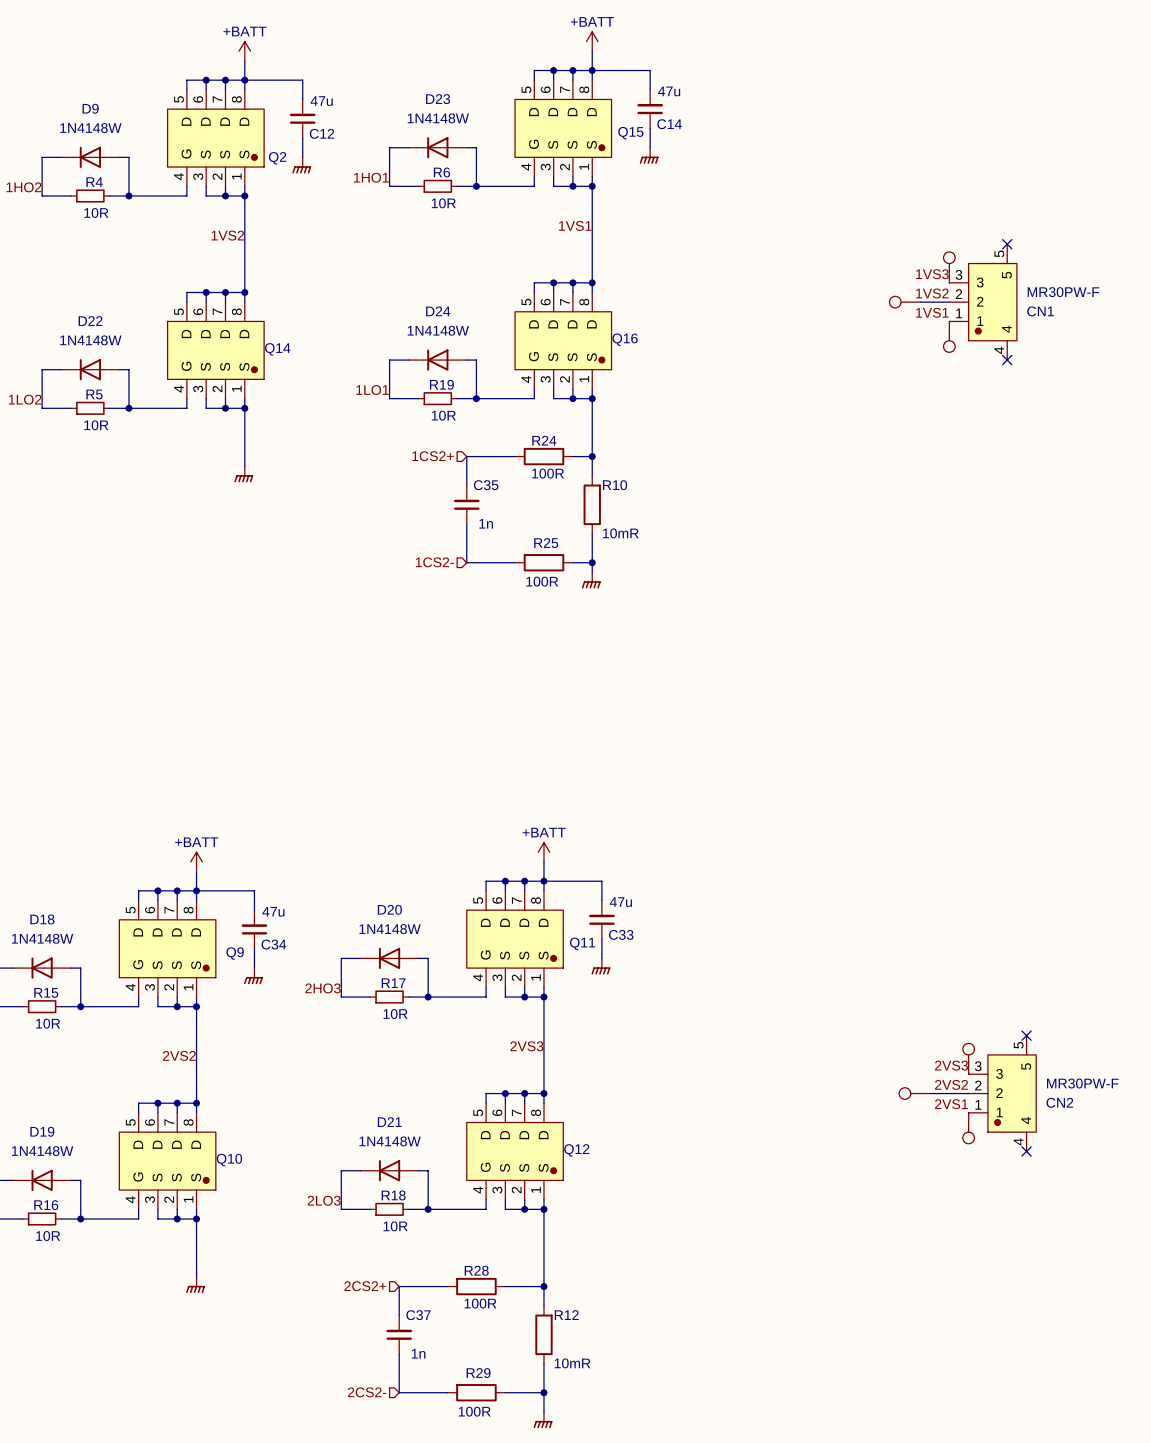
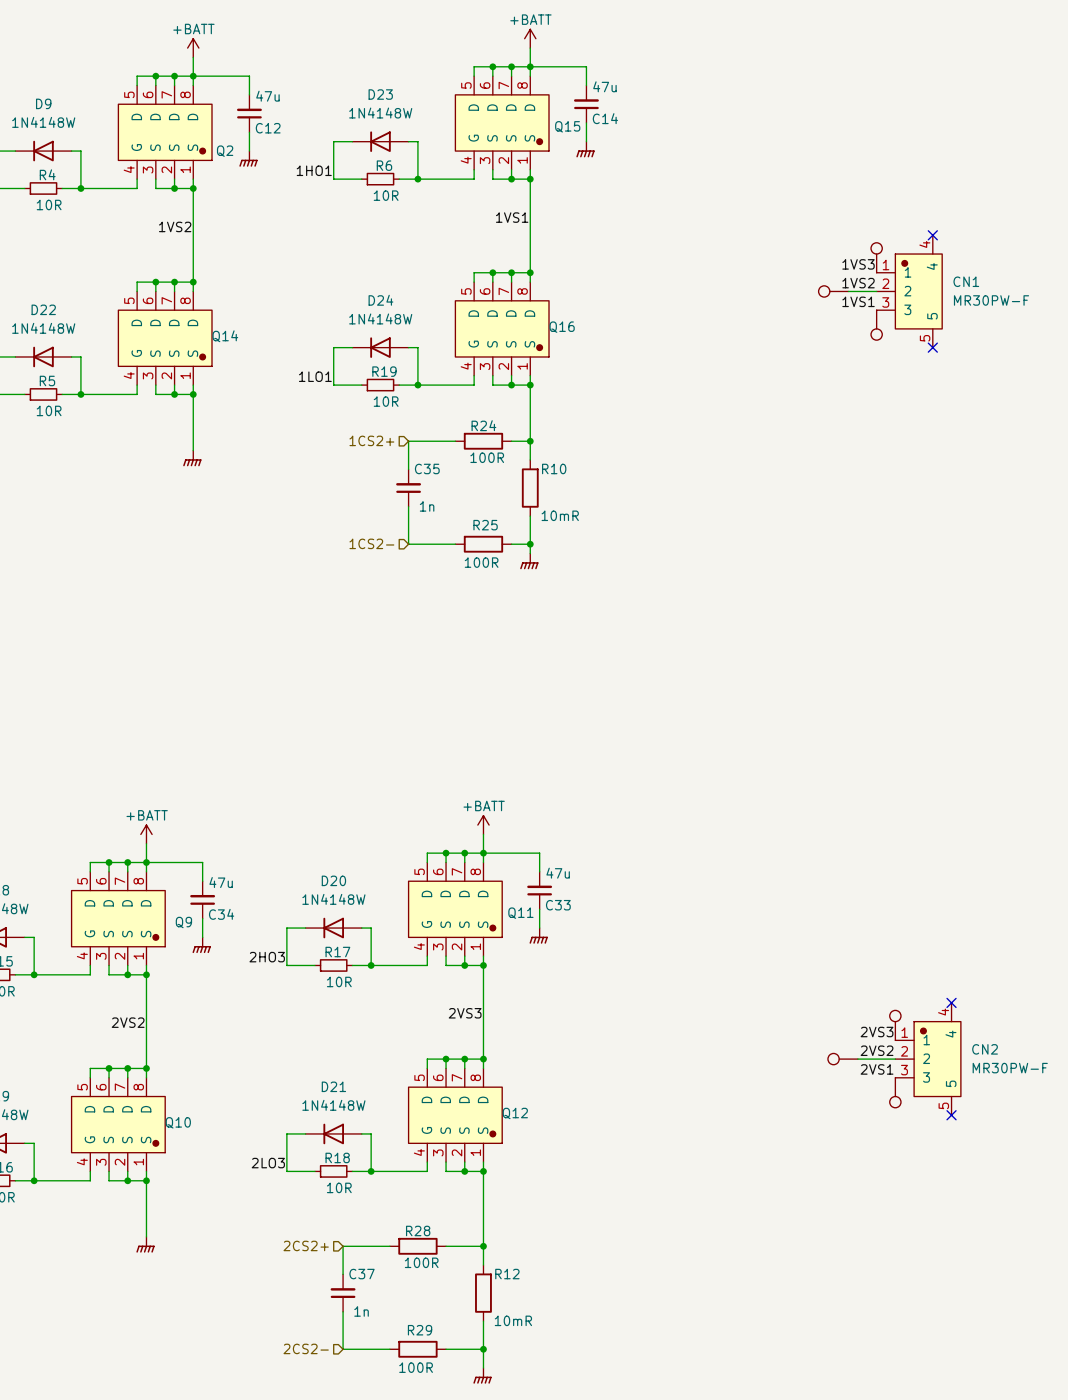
CN1 flip: as is (992, 302) -> up-down (918, 291)
CN2 flip: as is (1012, 1093) -> up-down (937, 1059)

